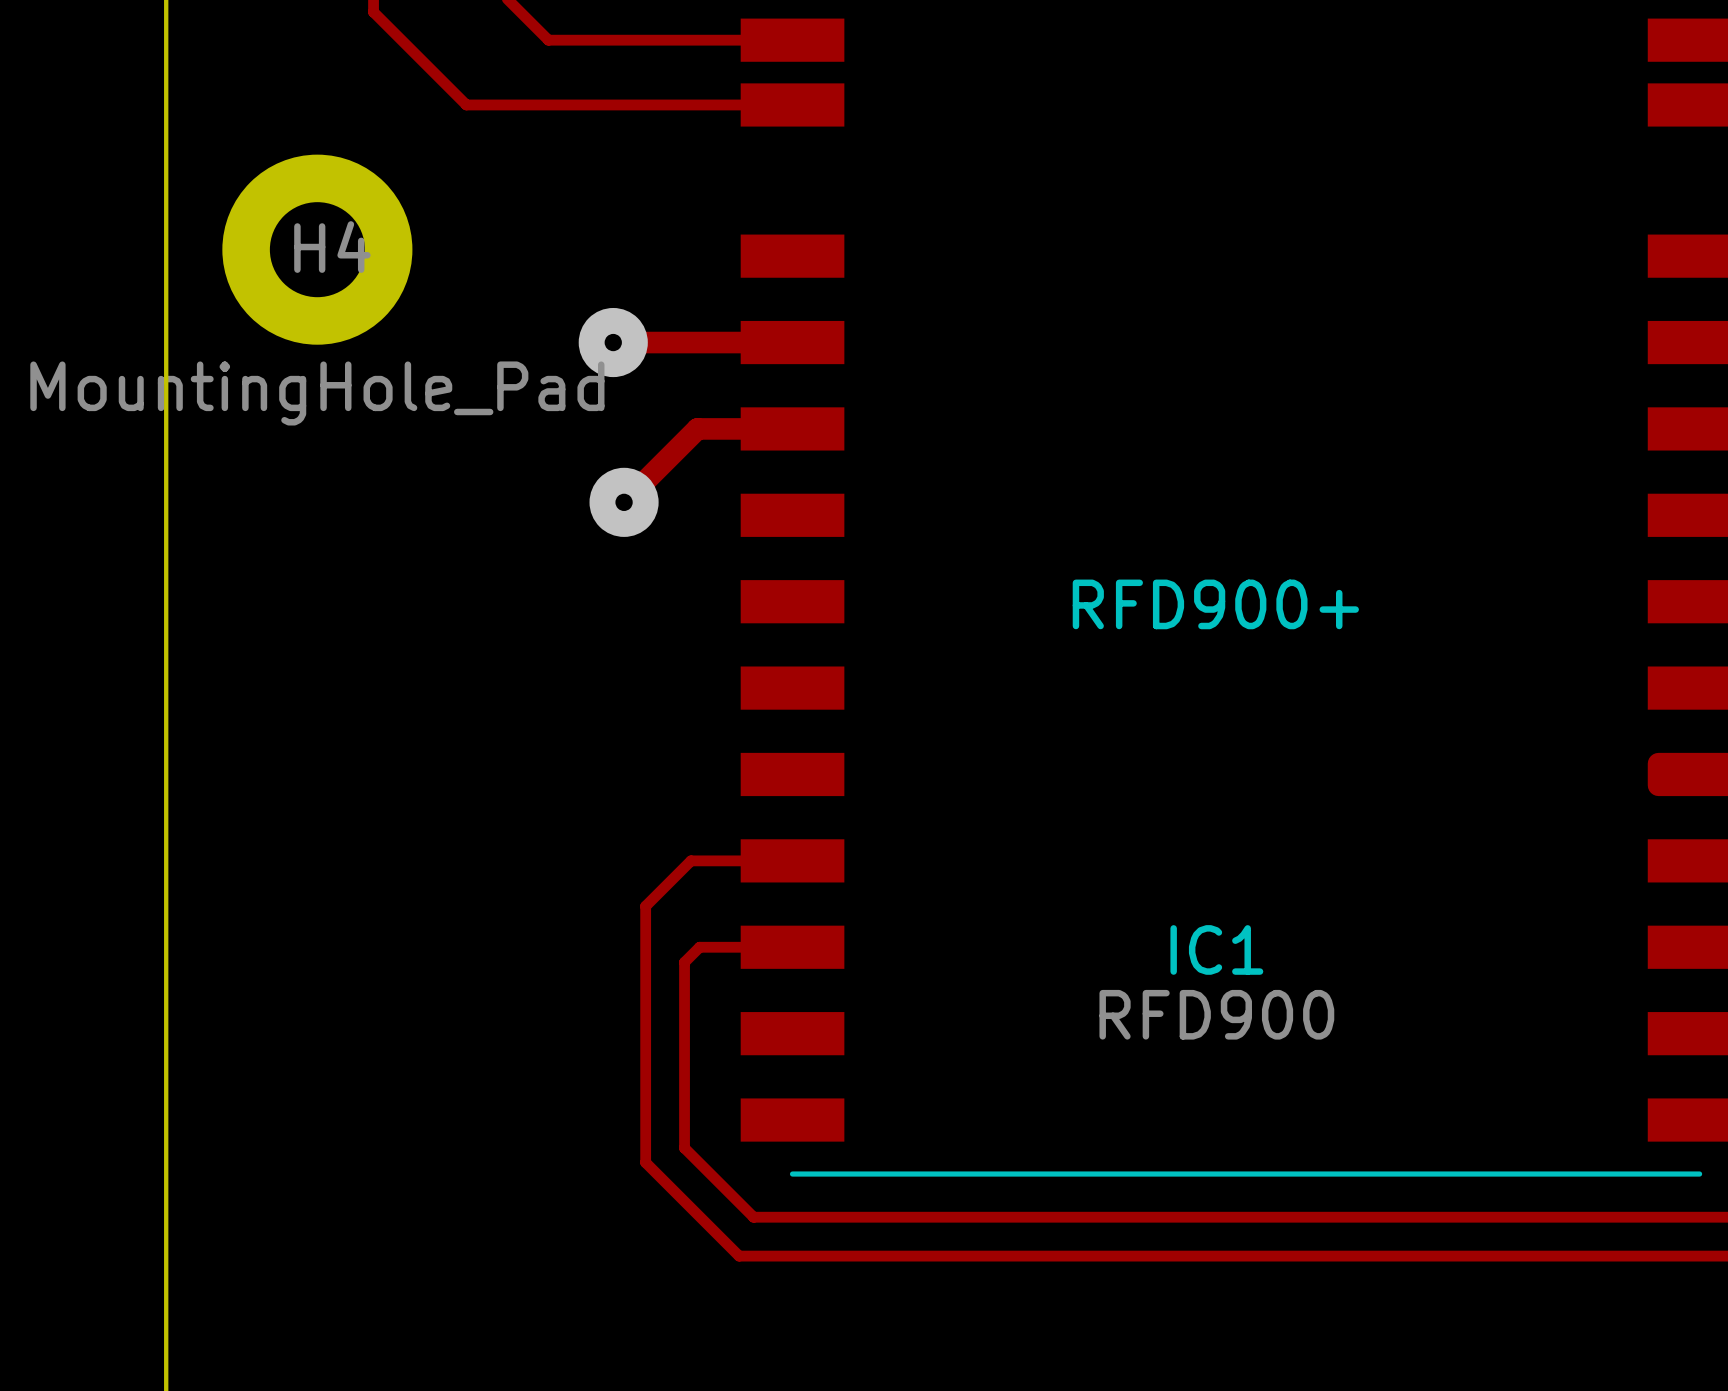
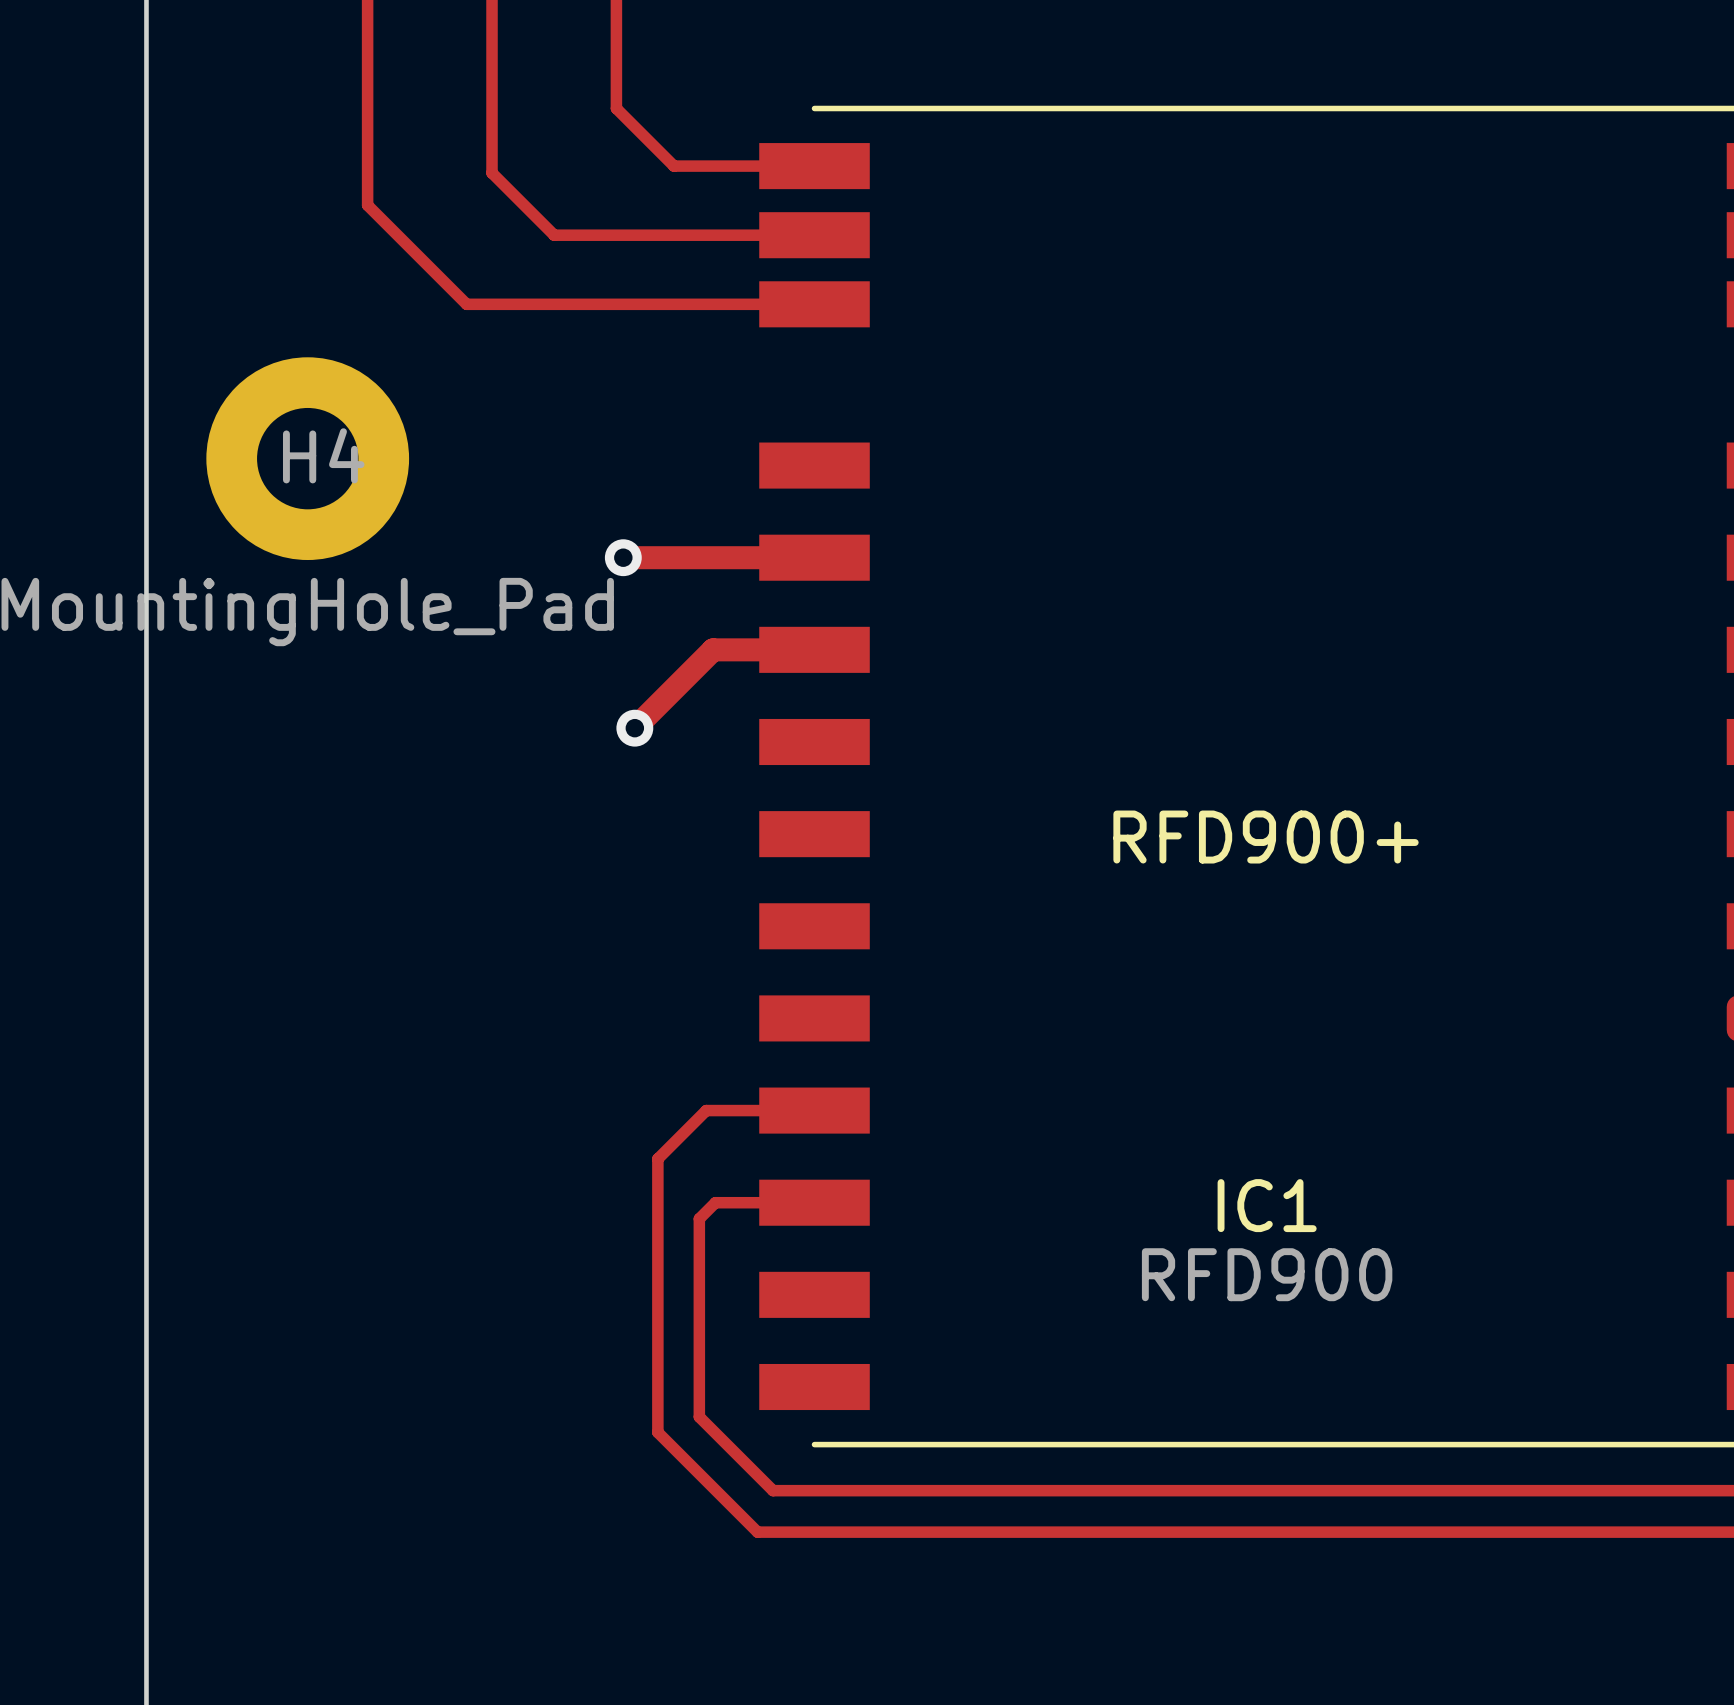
via size: [578, 307, 648, 378] -> [604, 539, 642, 577]
via size: [589, 467, 659, 537] -> [616, 709, 654, 747]

